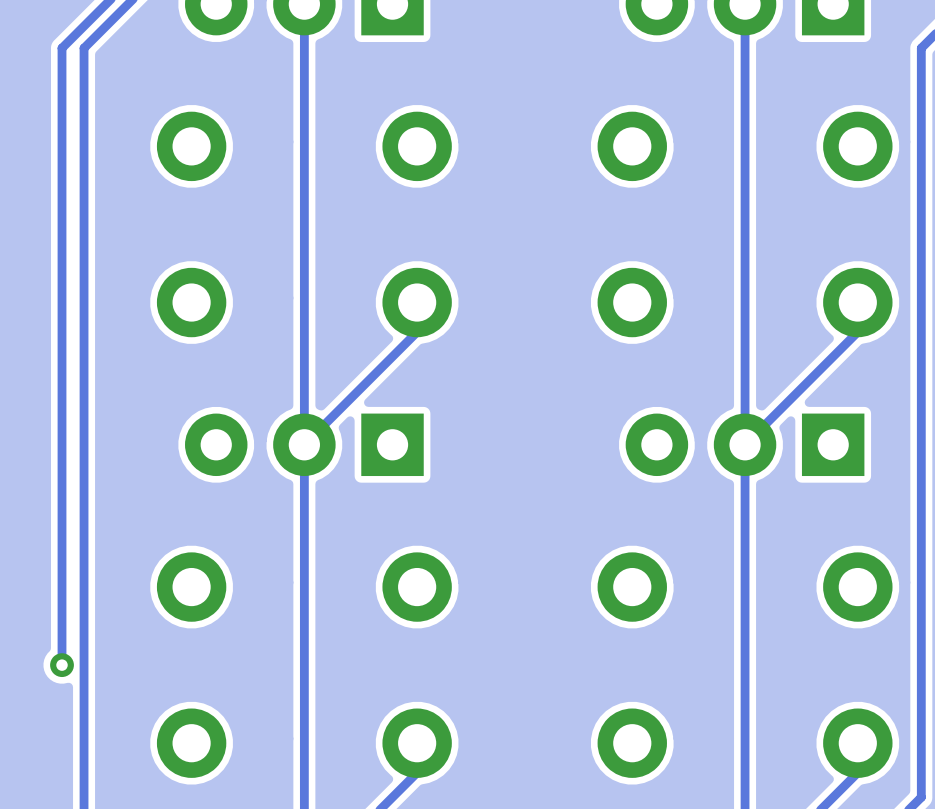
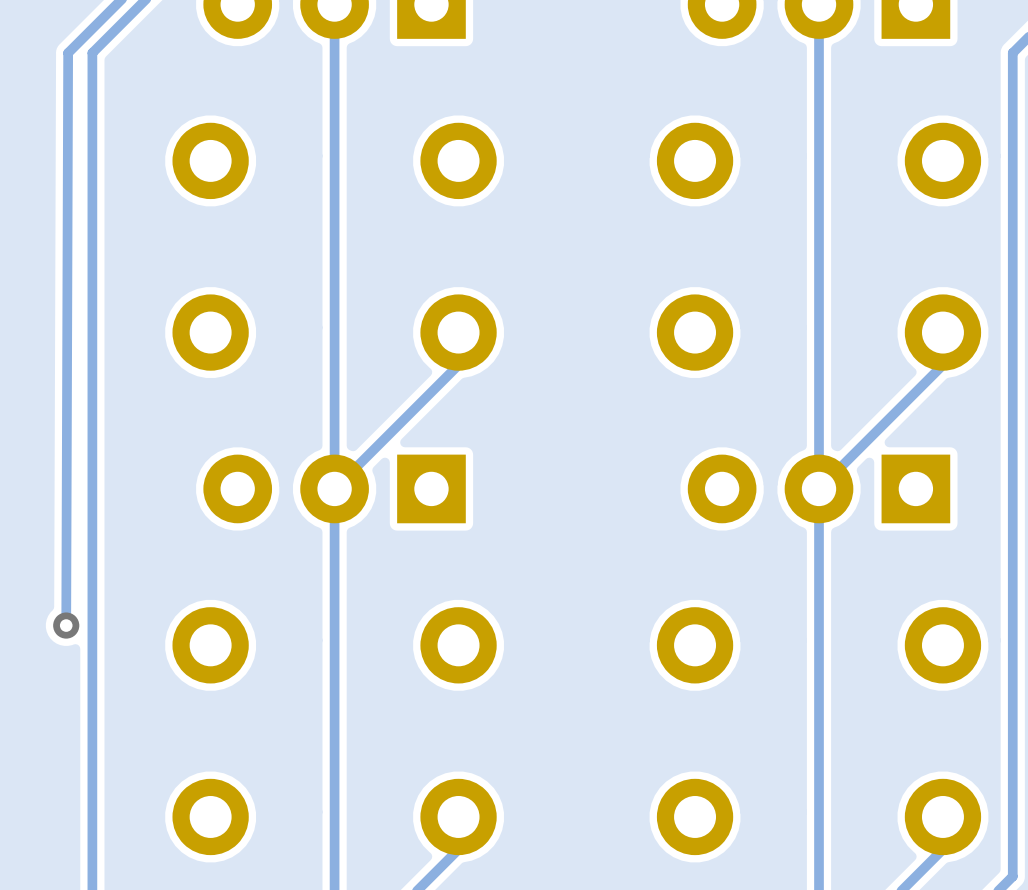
track: (62, 48) (62, 665) -> (68, 52) (66, 625)
via position: (62, 665) -> (66, 625)

